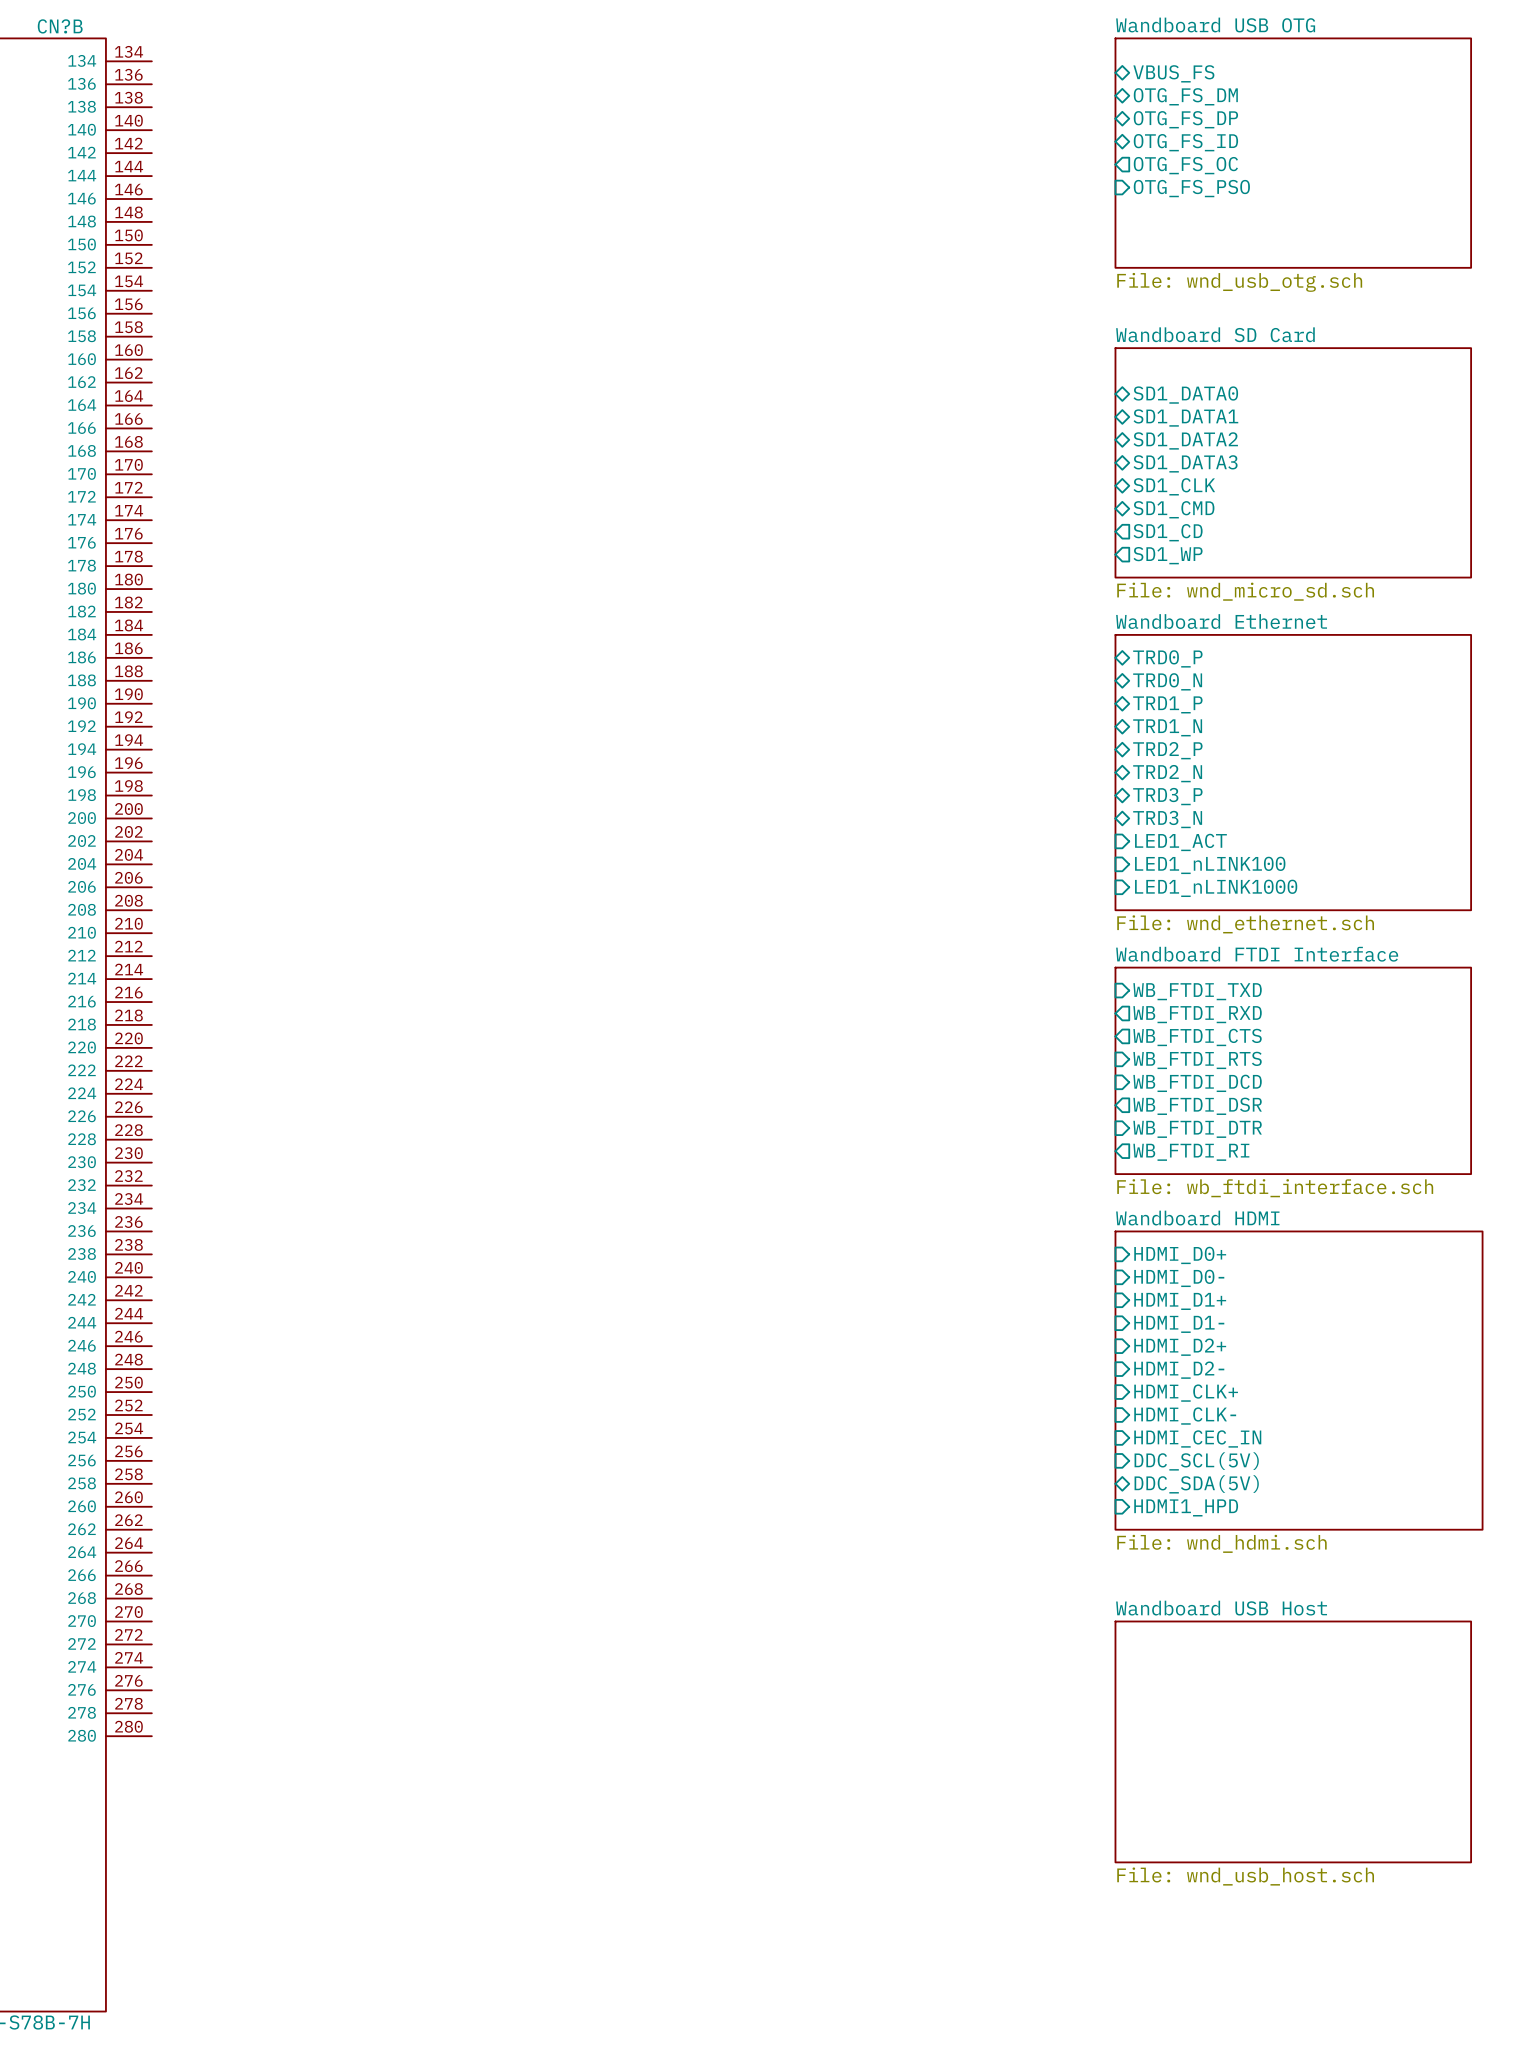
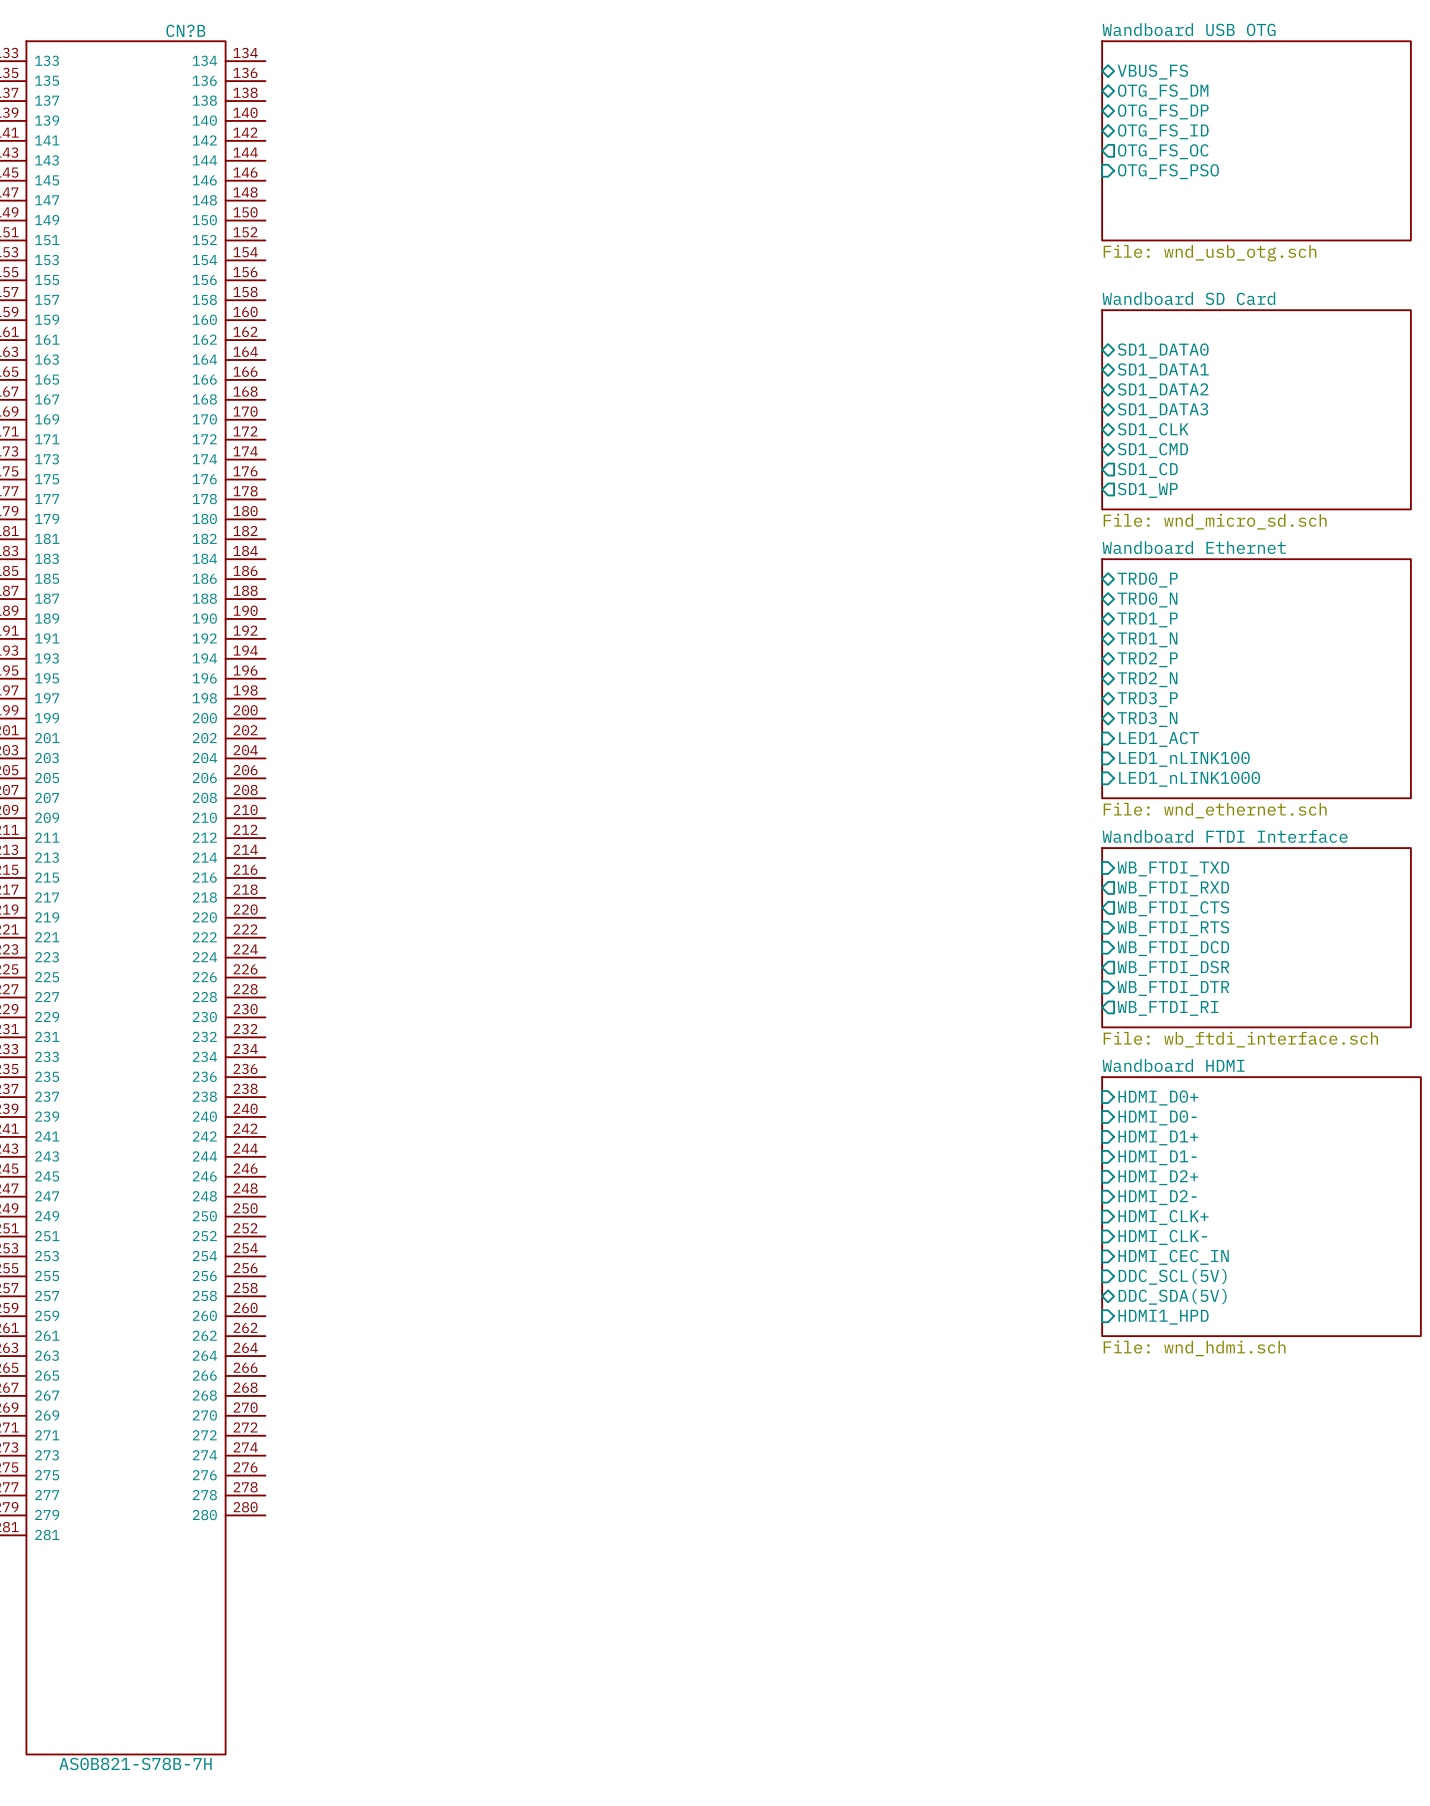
sheet Wandboard USB Host: File: wnd_usb_host.sch (1293, 1741) -> none

